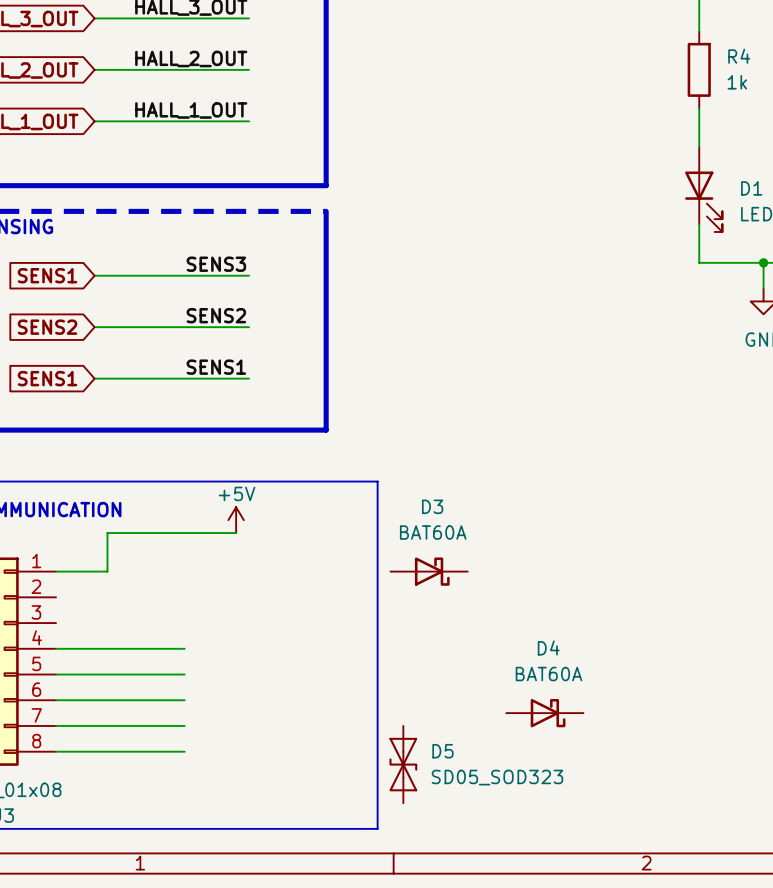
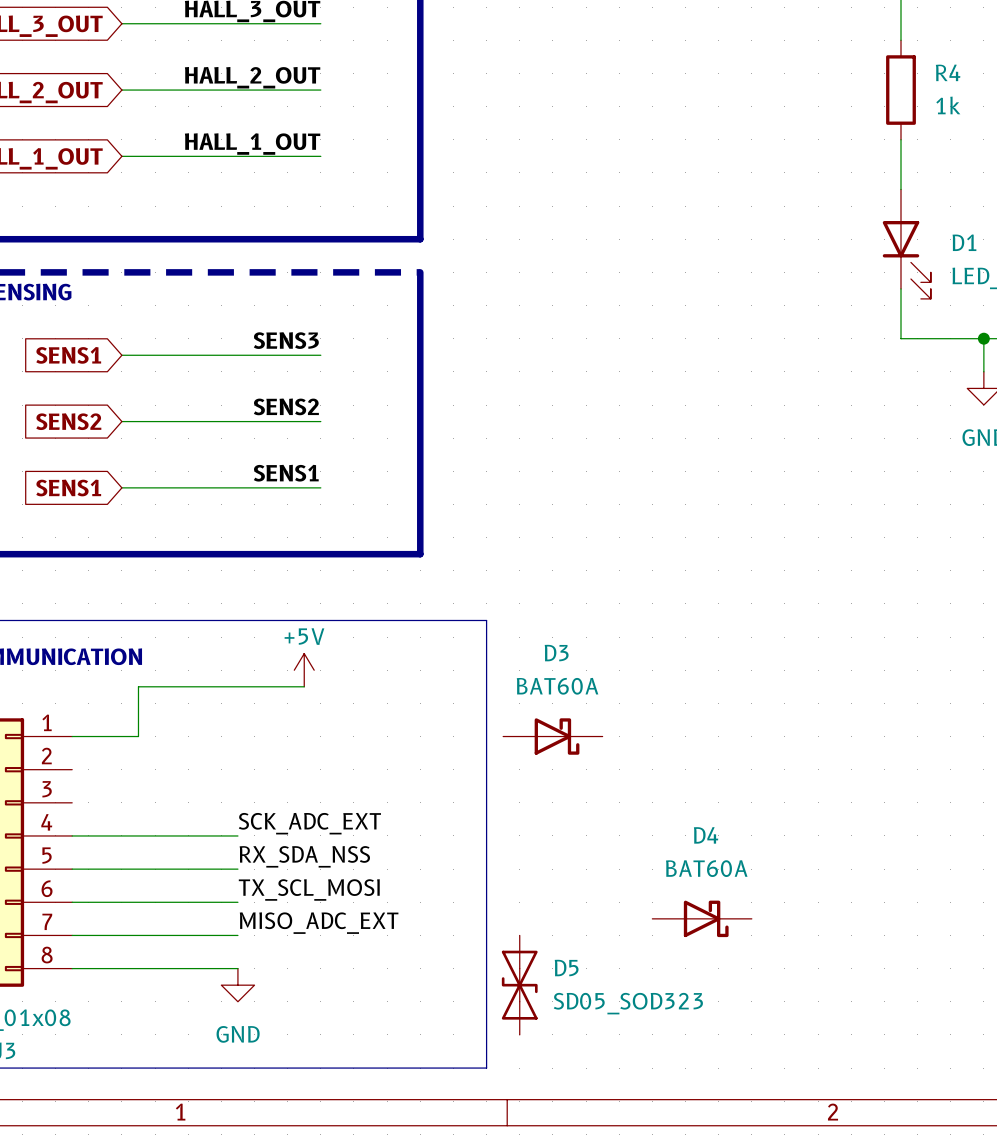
label: none -> SCK_ADC_EXT (309, 823)
label: none -> RX_SDA_NSS (304, 856)
label: none -> TX_SCL_MOSI (309, 889)
label: none -> MISO_ADC_EXT (319, 923)
power symbol: none -> GND (237, 985)

